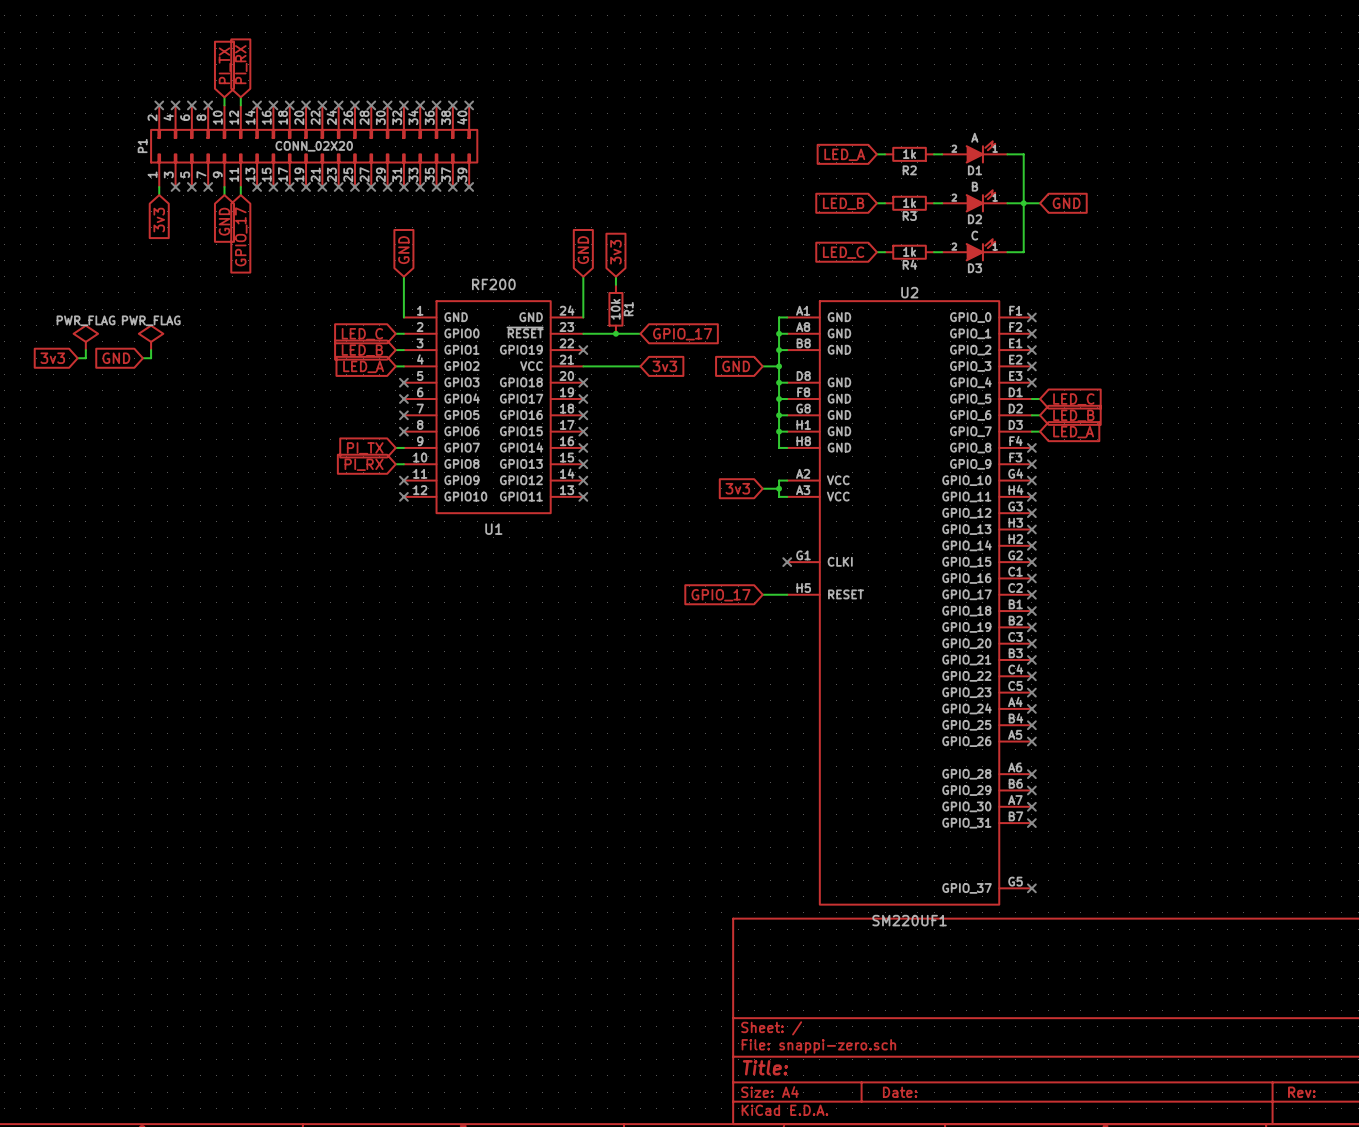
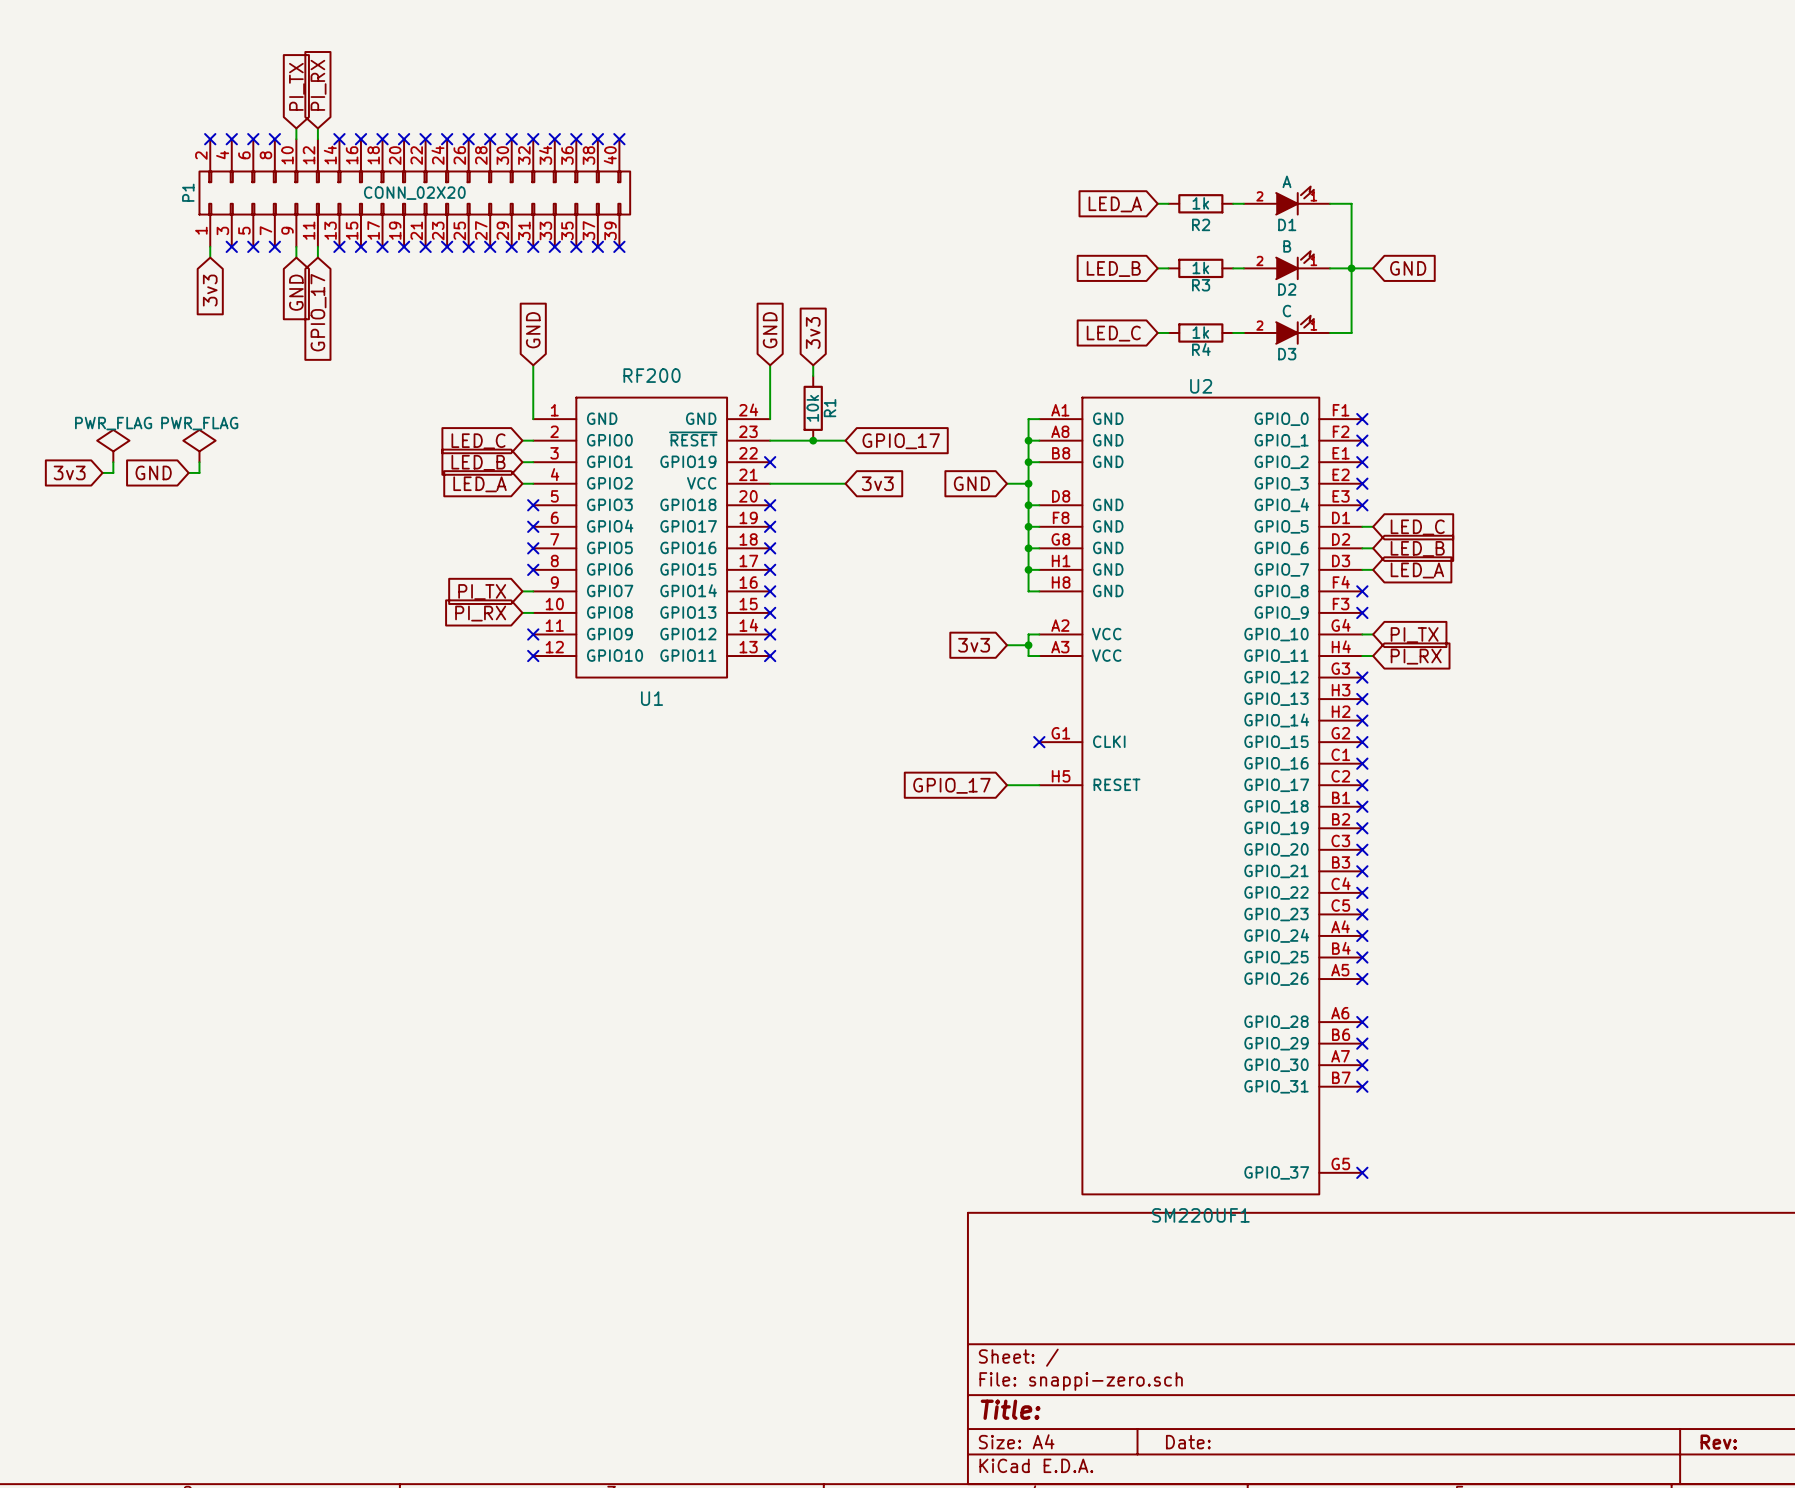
wire: none -> (1362, 634) (1373, 634)
no-connect mark: (1031, 480) -> none
global label: none -> PI_TX (1414, 635)
wire: none -> (1362, 656) (1373, 656)
no-connect mark: (1031, 496) -> none
global label: none -> PI_RX (1416, 656)

